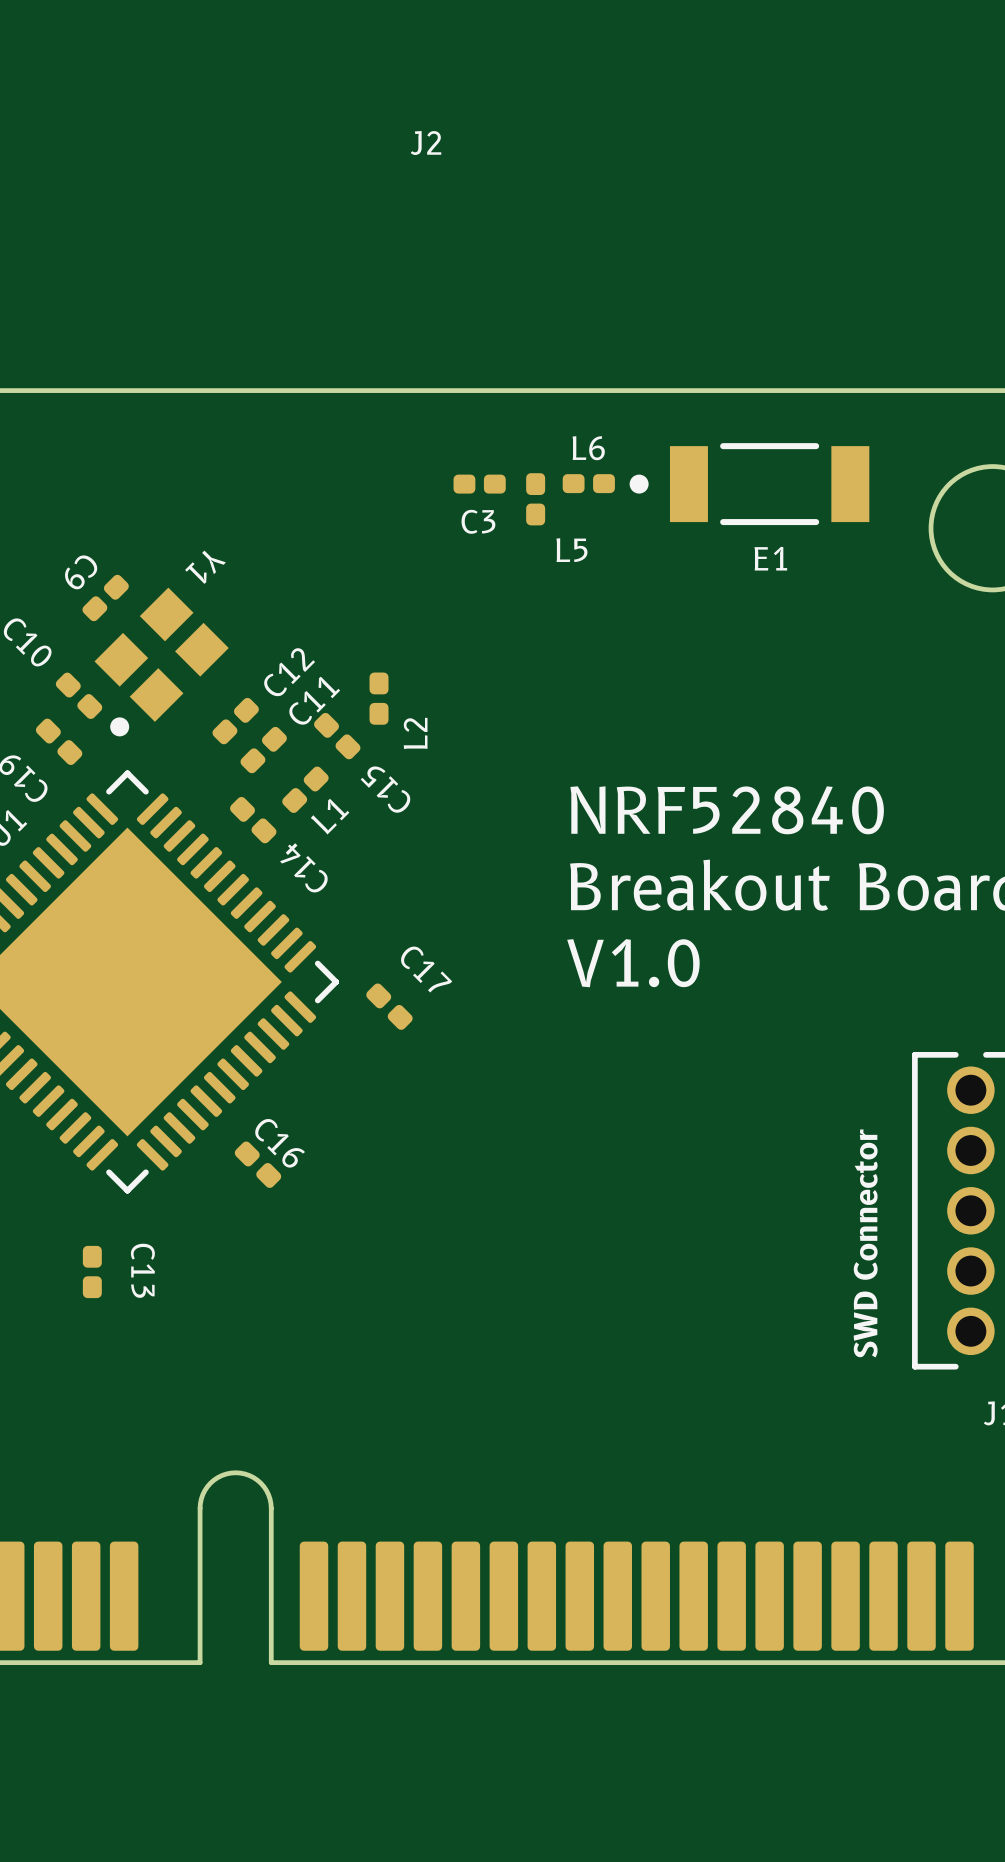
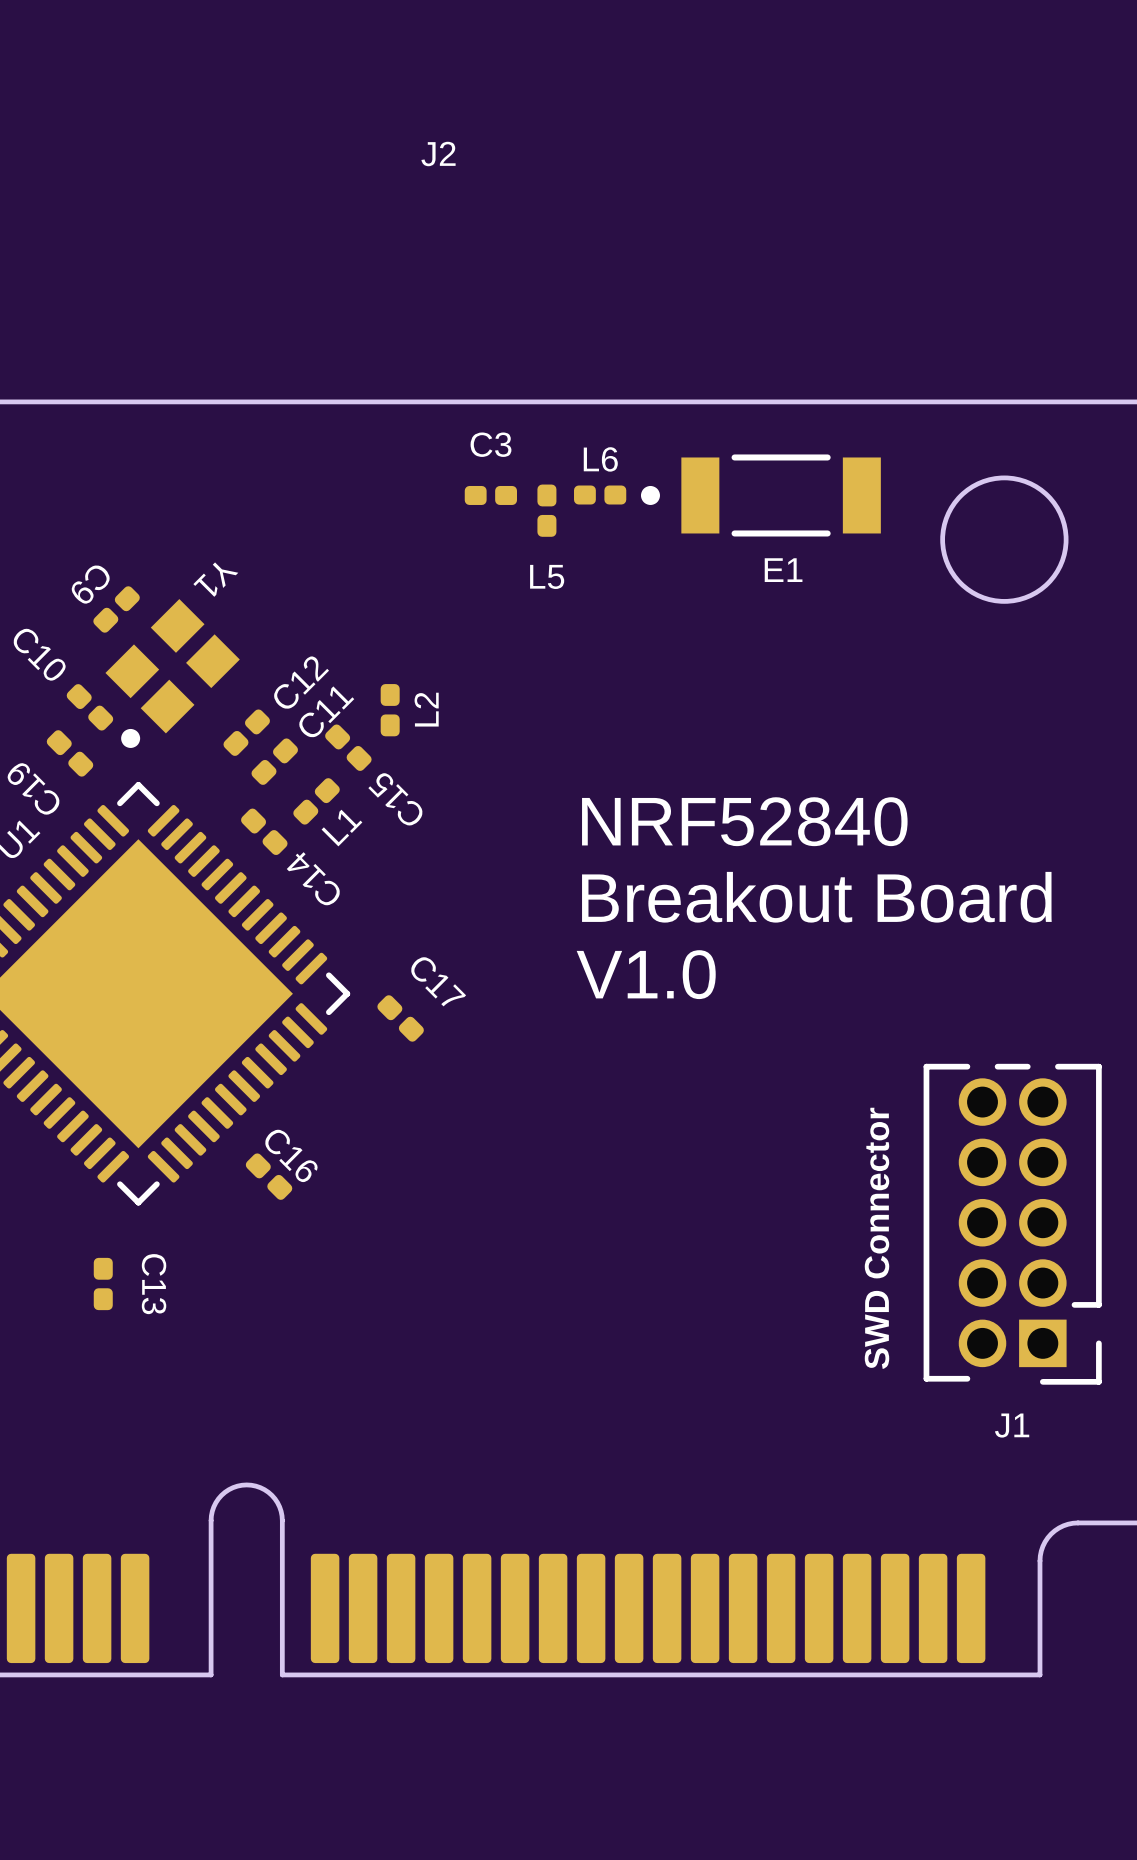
C3 name position: C3 (478, 521) -> C3 (490, 444)
L5 name position: L5 (571, 550) -> L5 (547, 576)
L2 name position: L2 (415, 733) -> L2 (426, 709)

